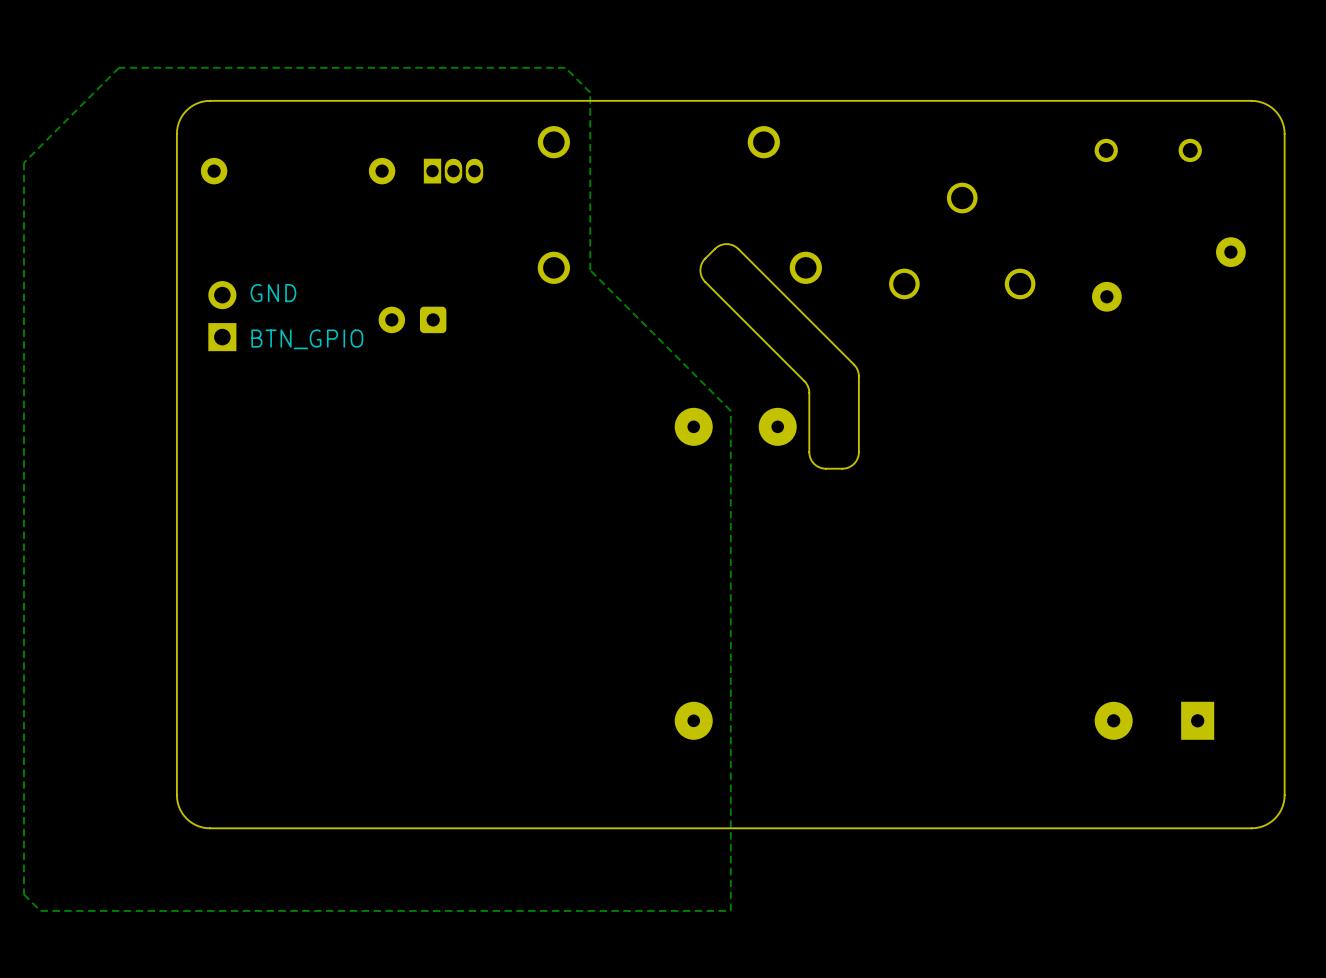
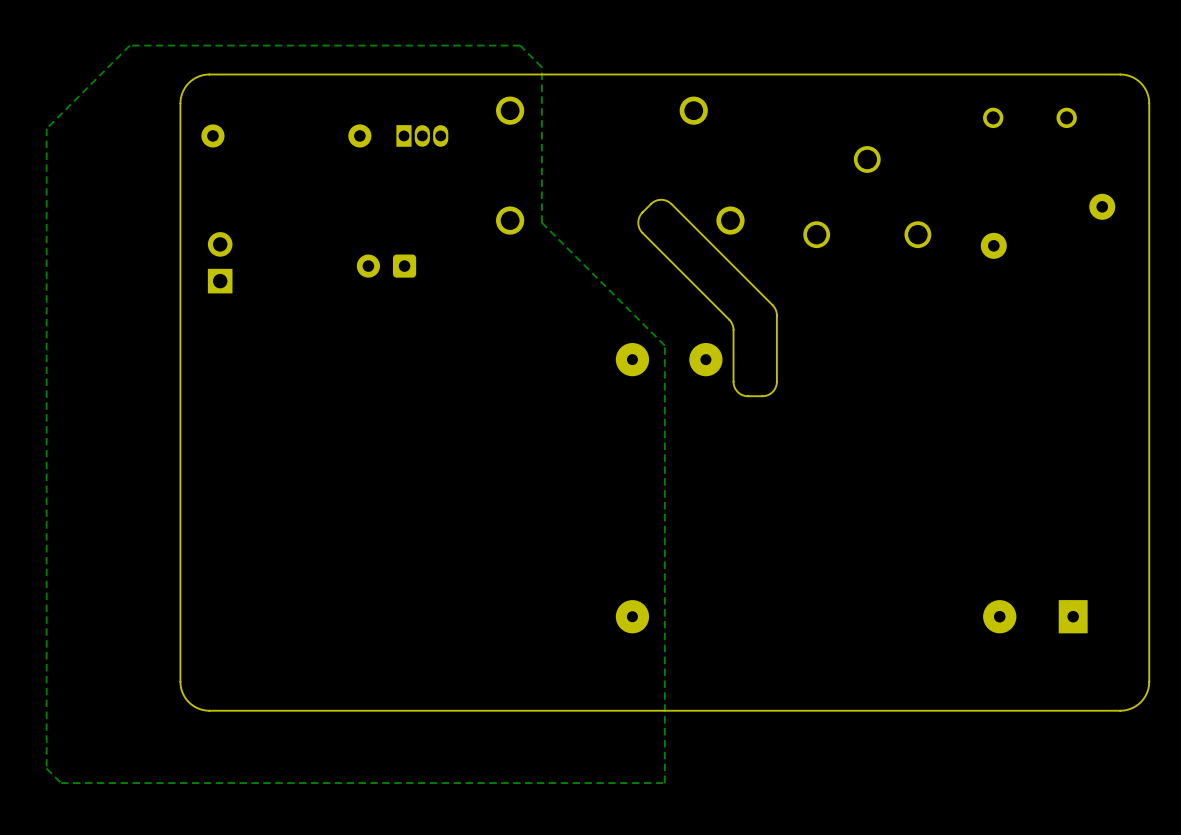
text: GND (273, 293) -> none
text: BTN_GPIO (307, 339) -> none

